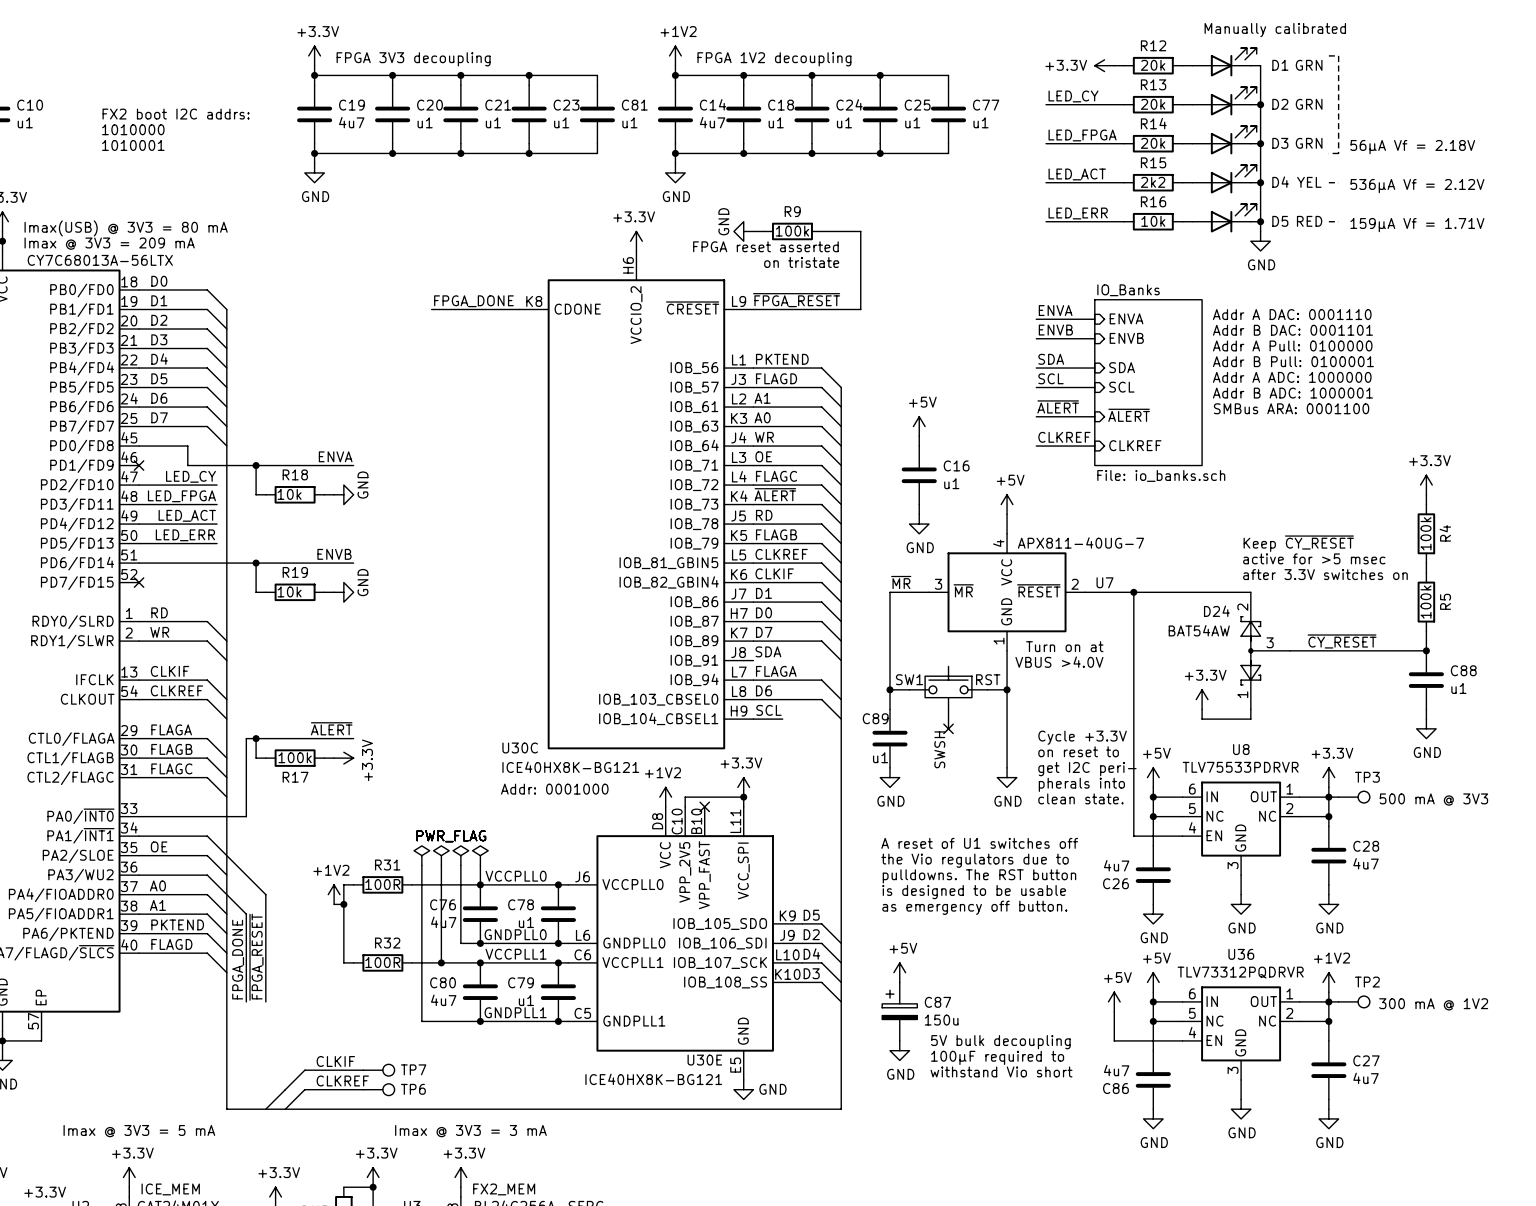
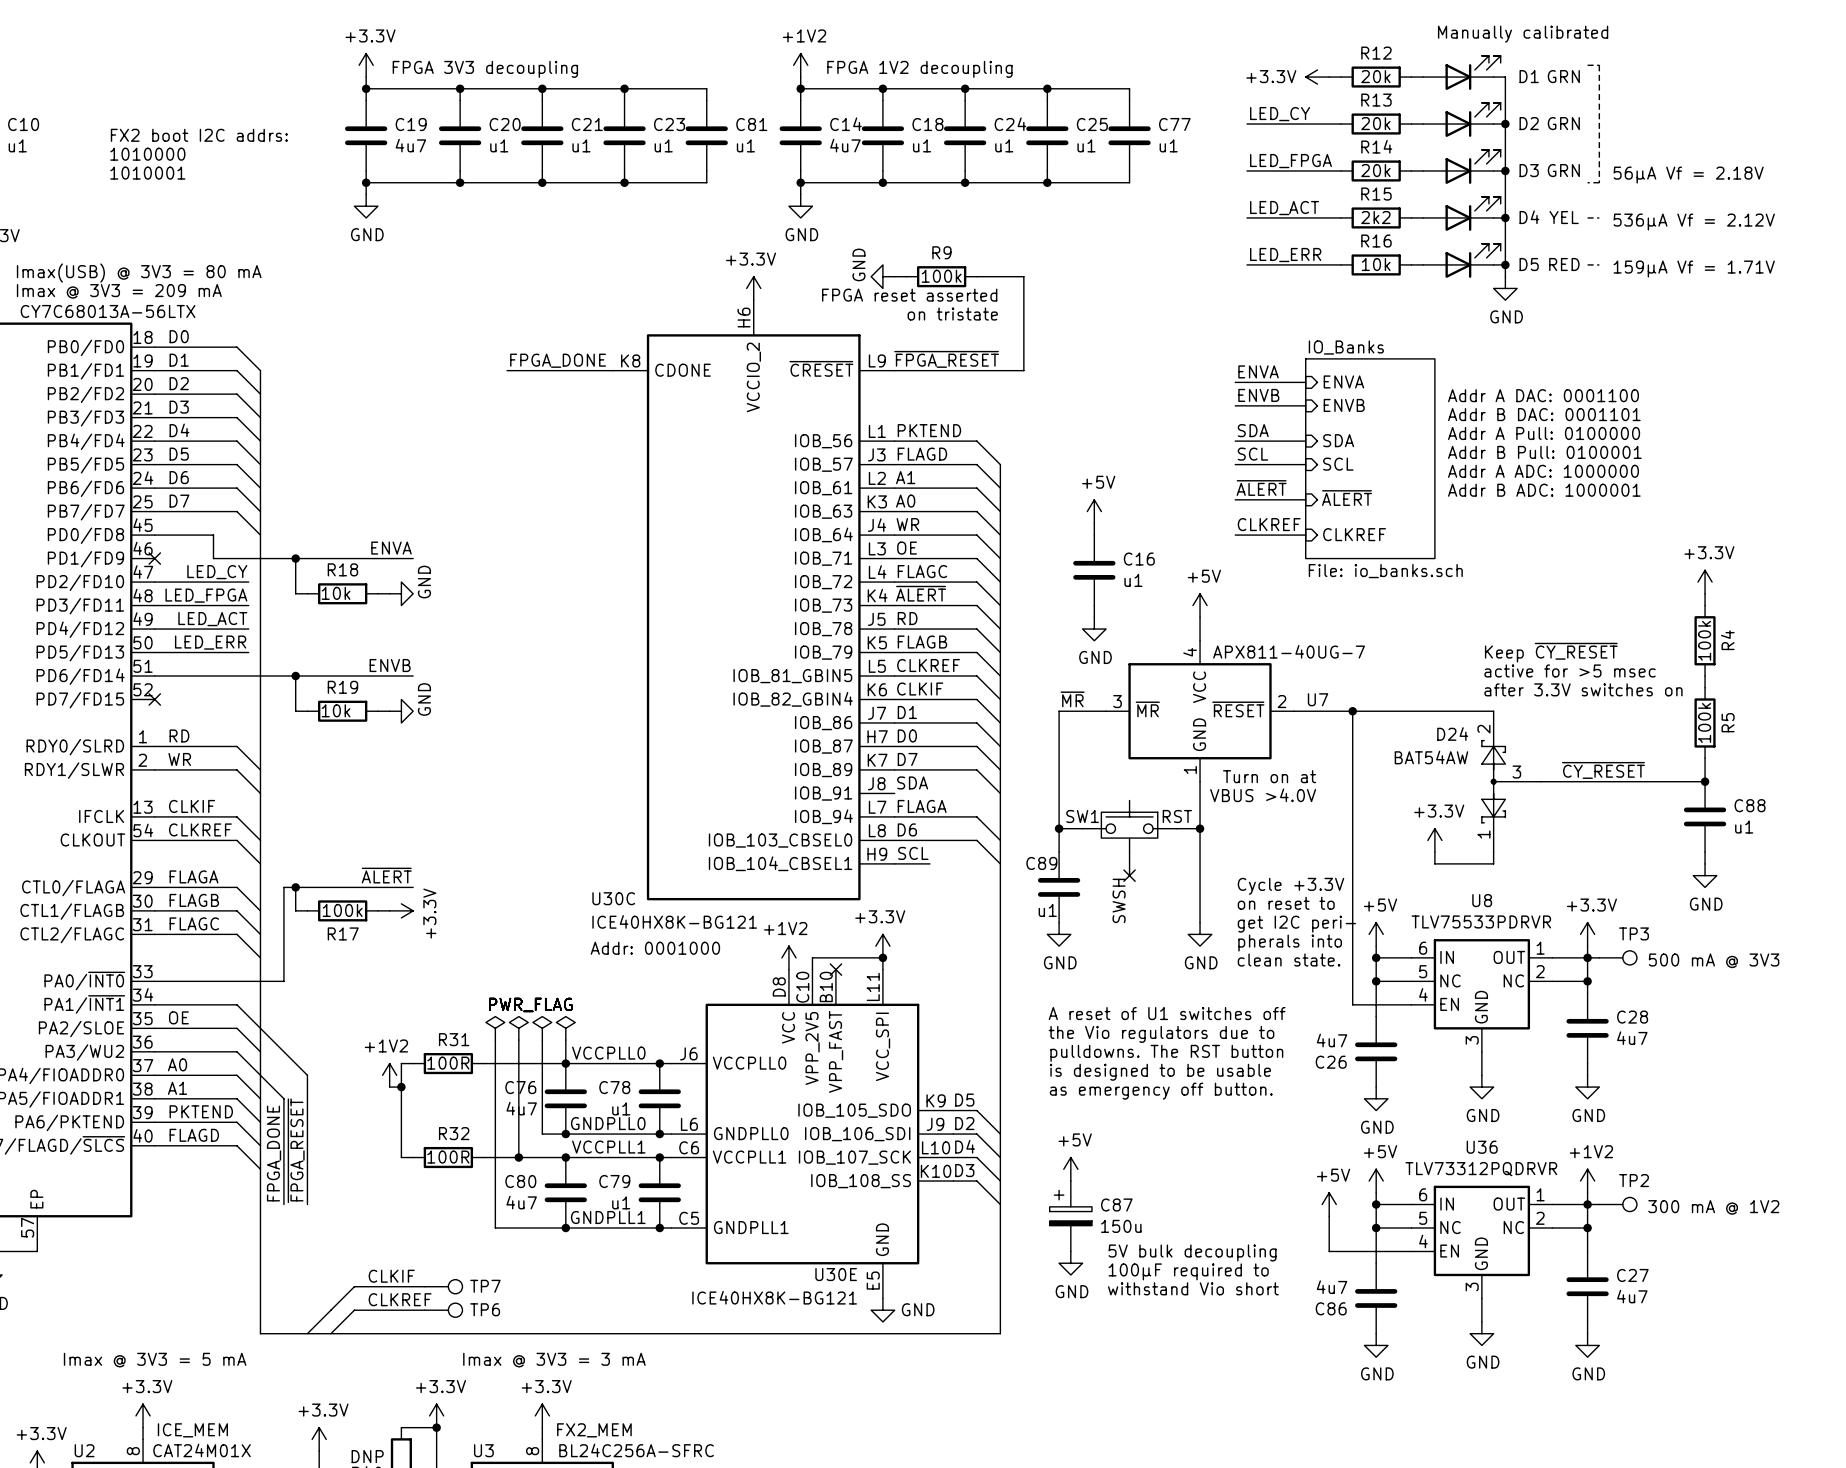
text: Addr A DAC: 0001110 (1292, 314) -> none
text: Addr B DAC: 0001101 (1292, 330) -> Addr A DAC: 0001100 (1543, 395)
text: Addr A Pull: 0100000 (1292, 345) -> Addr B DAC: 0001101 (1544, 414)
text: Addr B Pull: 0100001 (1293, 361) -> Addr A Pull: 0100000 (1544, 433)
text: Addr A ADC: 1000000 (1292, 377) -> Addr B Pull: 0100001 (1544, 452)
text: Addr B ADC: 1000001 (1292, 393) -> Addr A ADC: 1000000 (1543, 471)
text: SMBus ARA: 0001100 (1291, 408) -> Addr B ADC: 1000001 (1544, 490)

